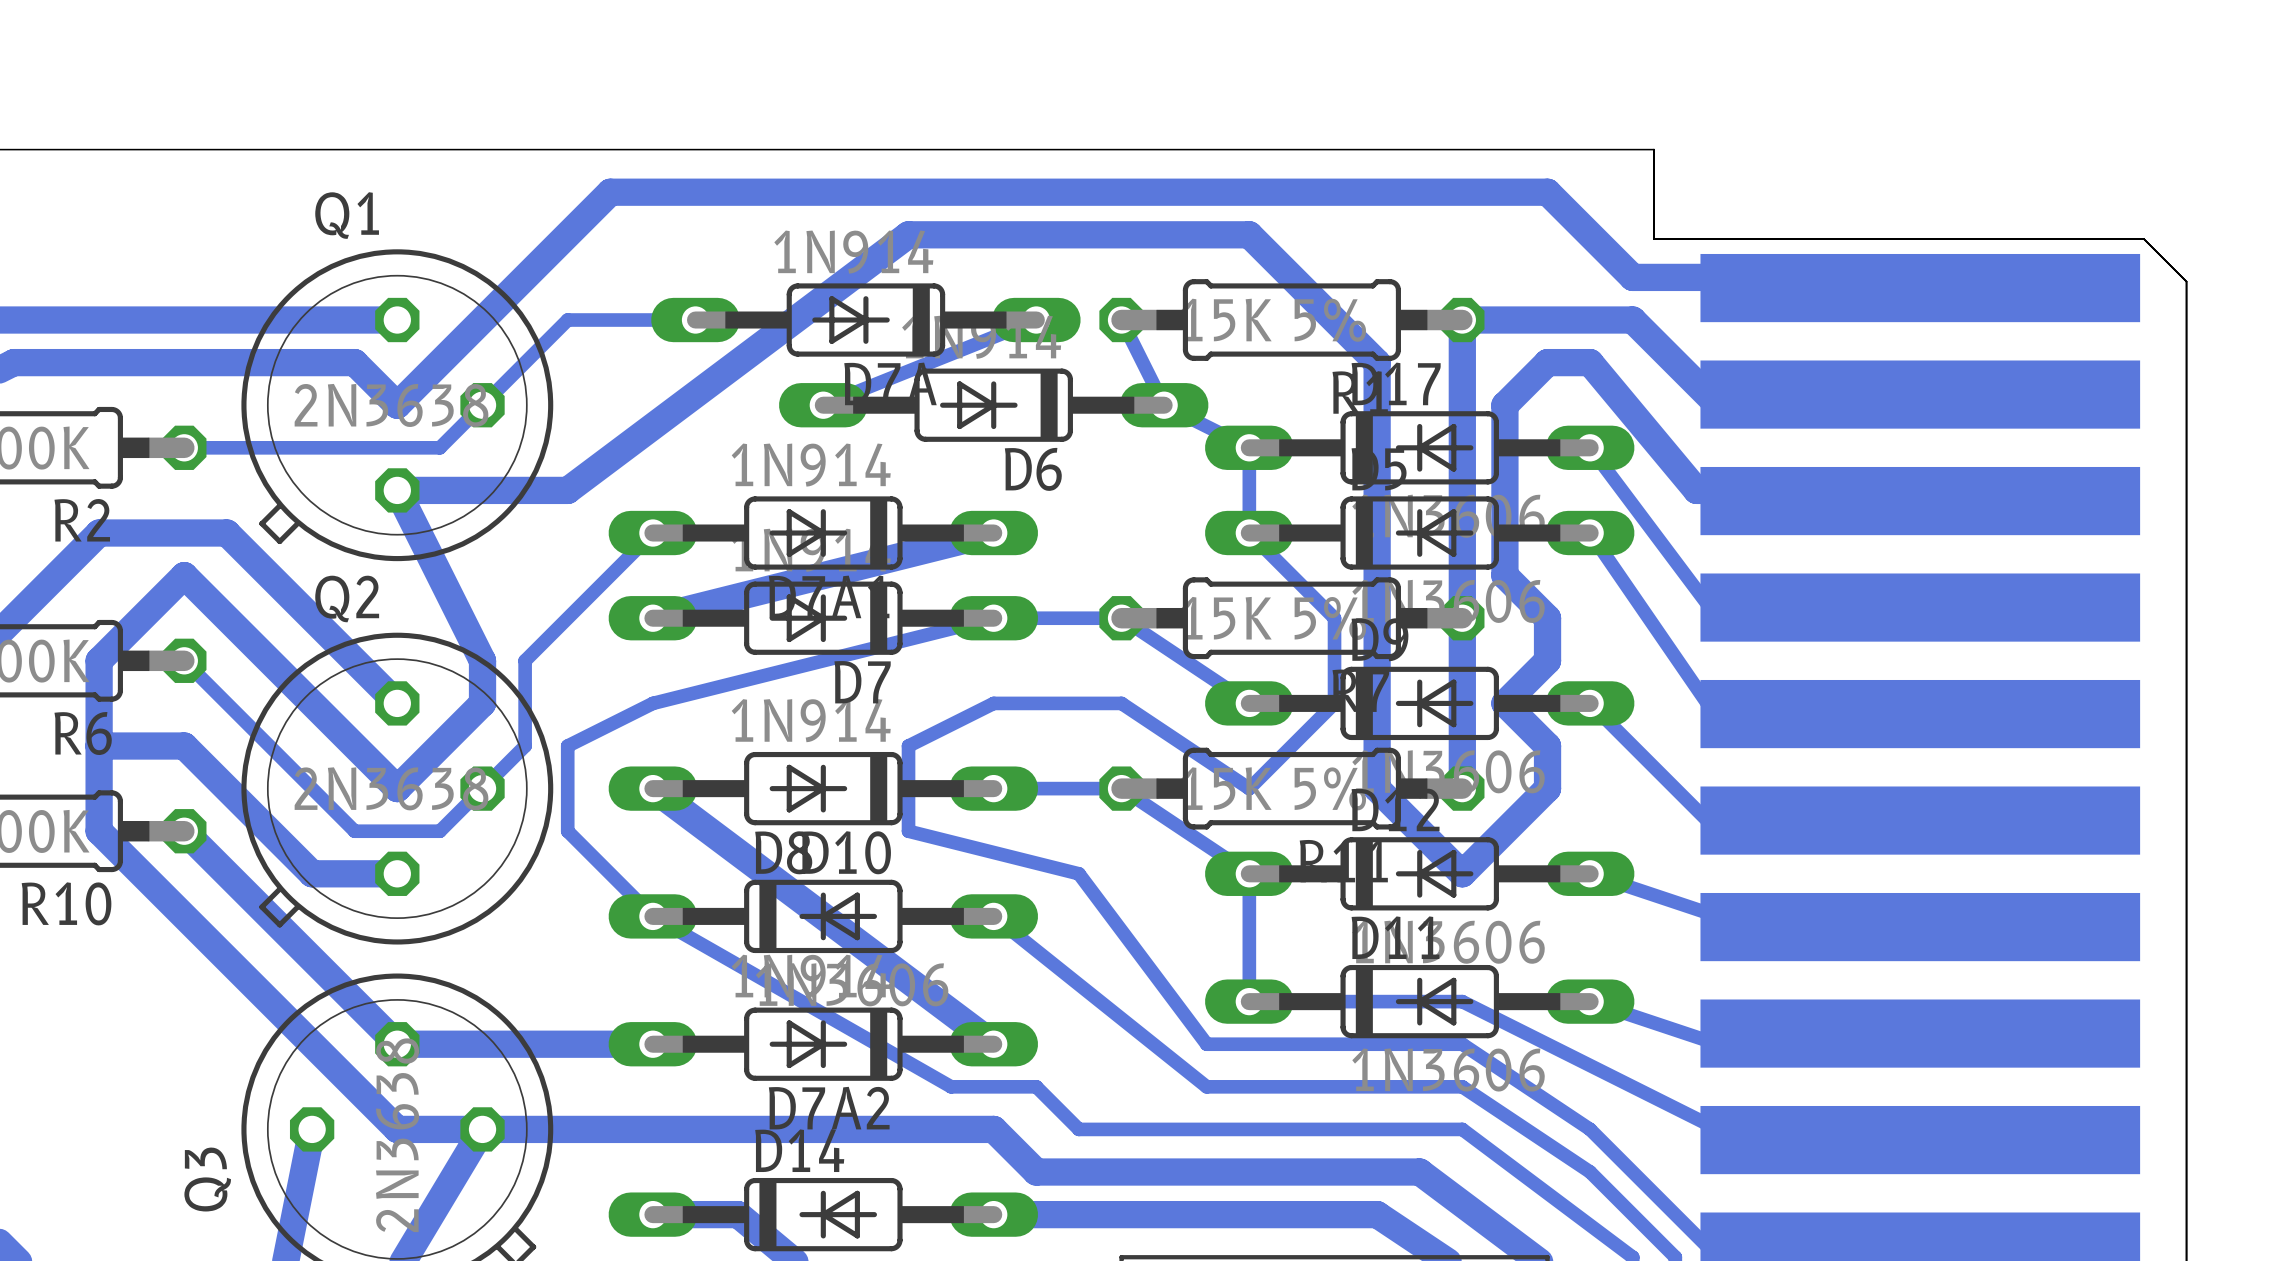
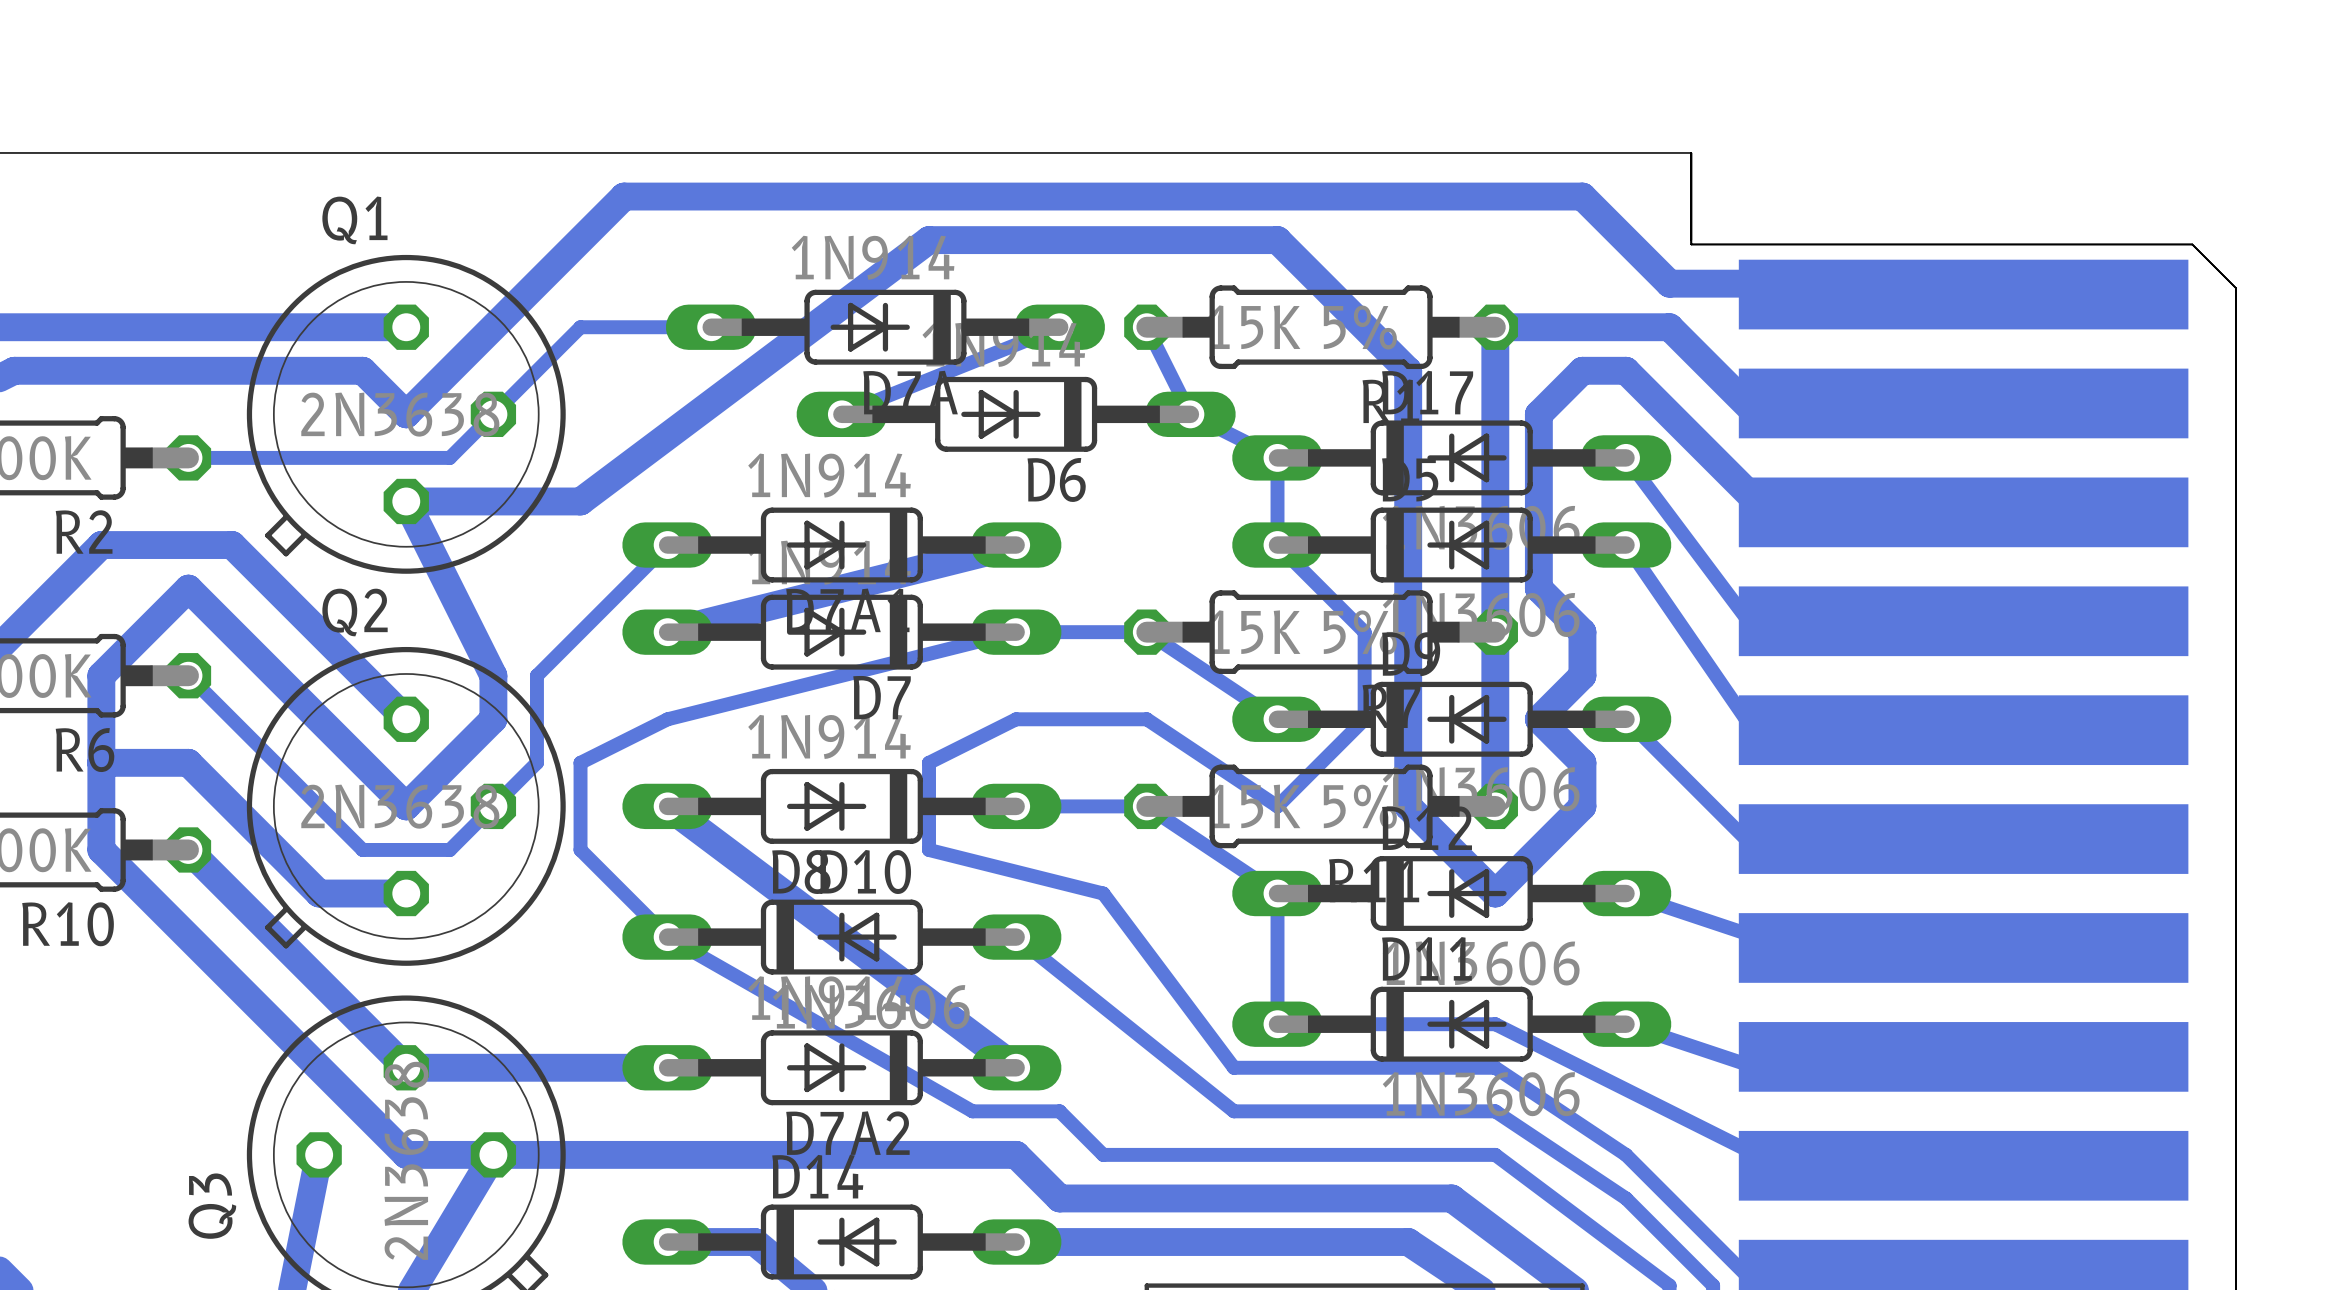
bottom track: (1590, 362) (1696, 490) (1717, 490) -> (1626, 370) (1756, 501)

